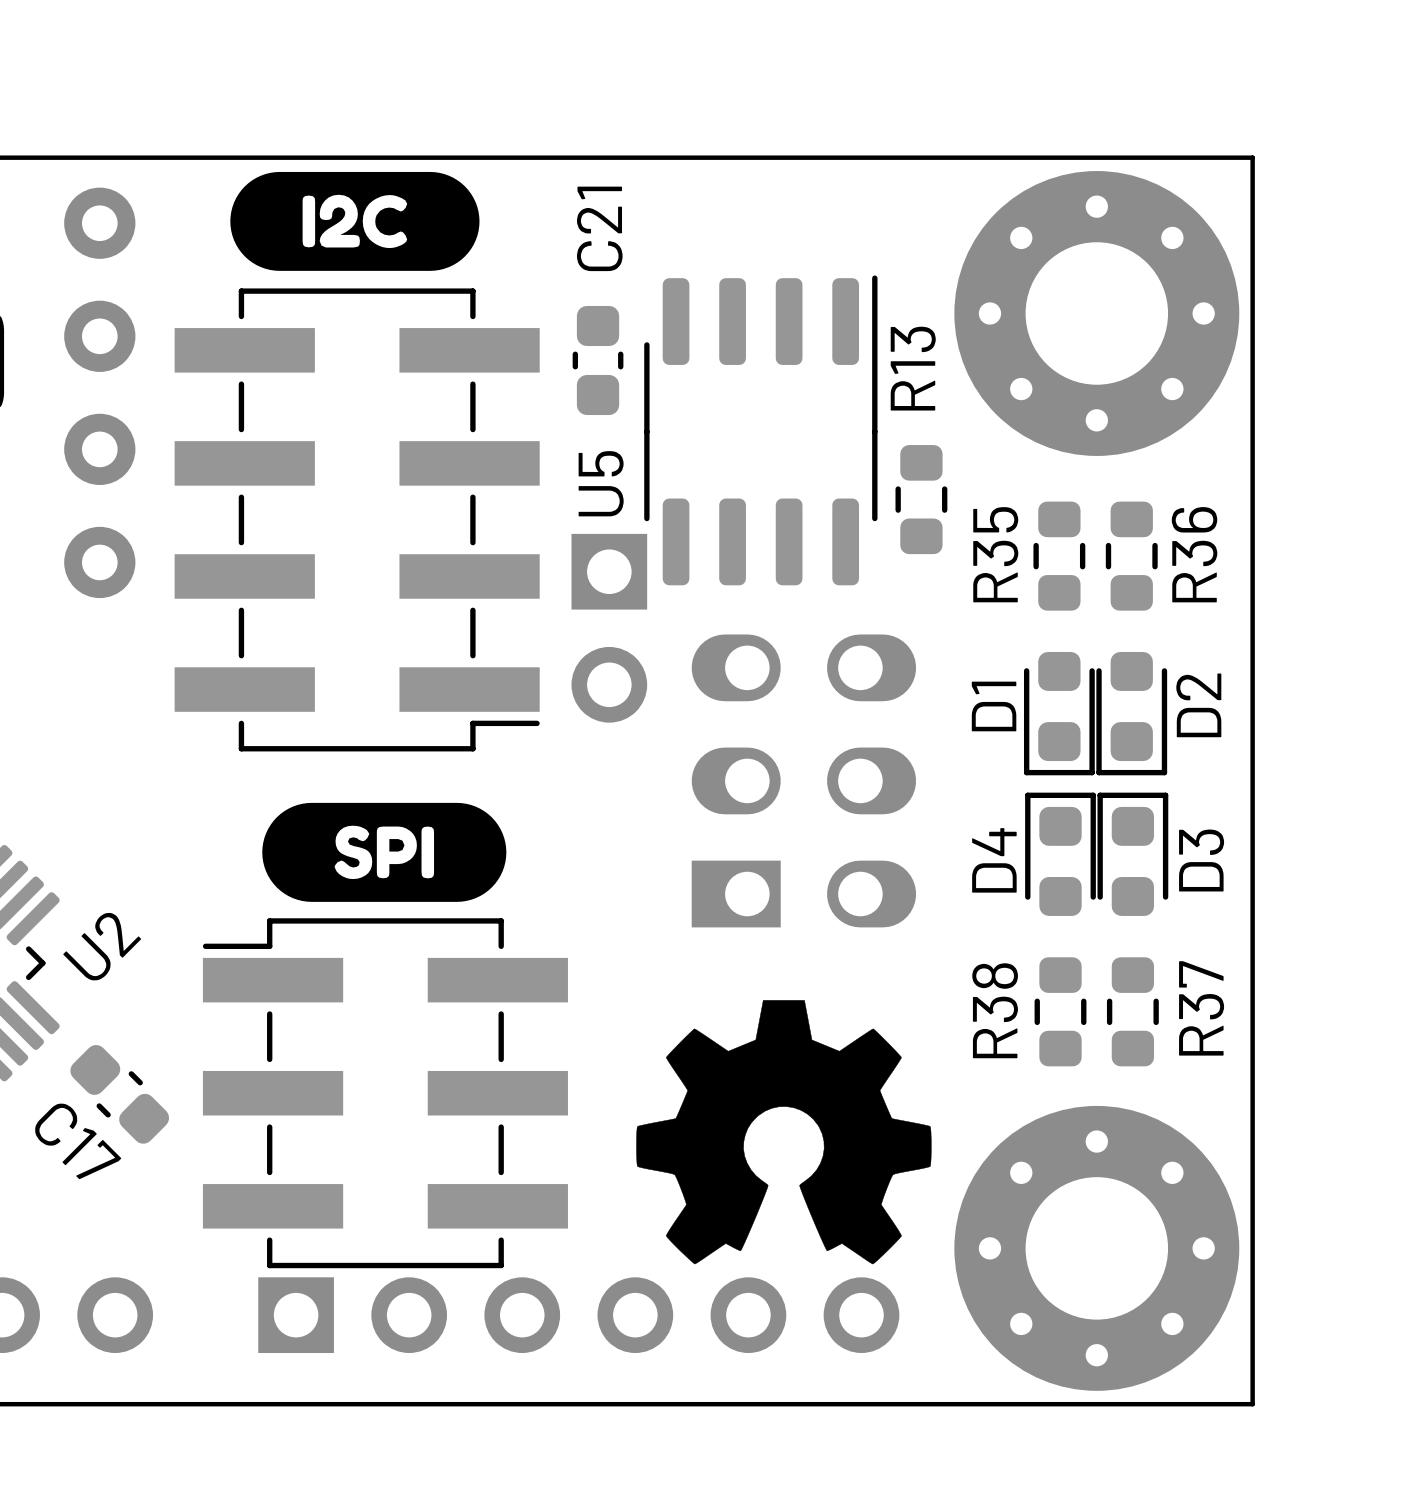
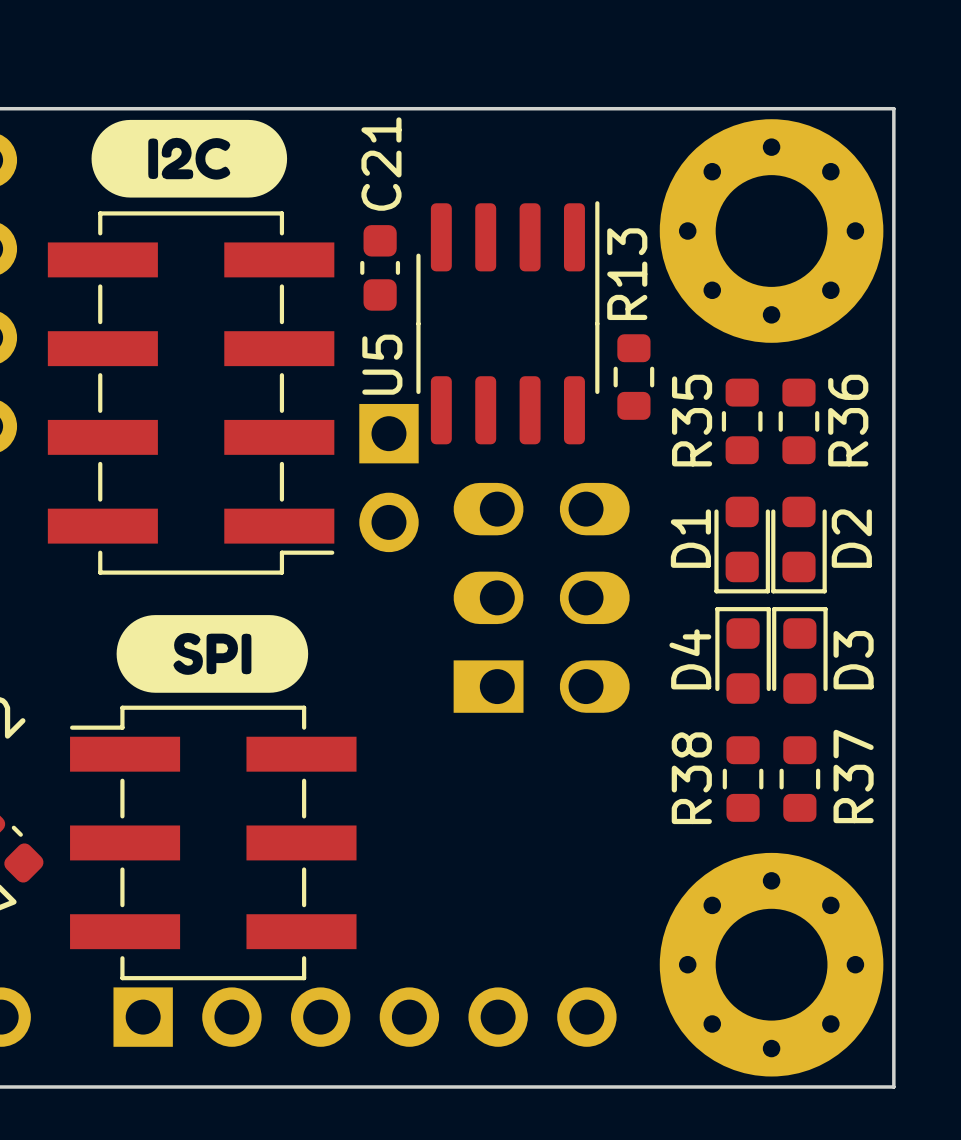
drawing: [636, 1000, 932, 1265] -> none

